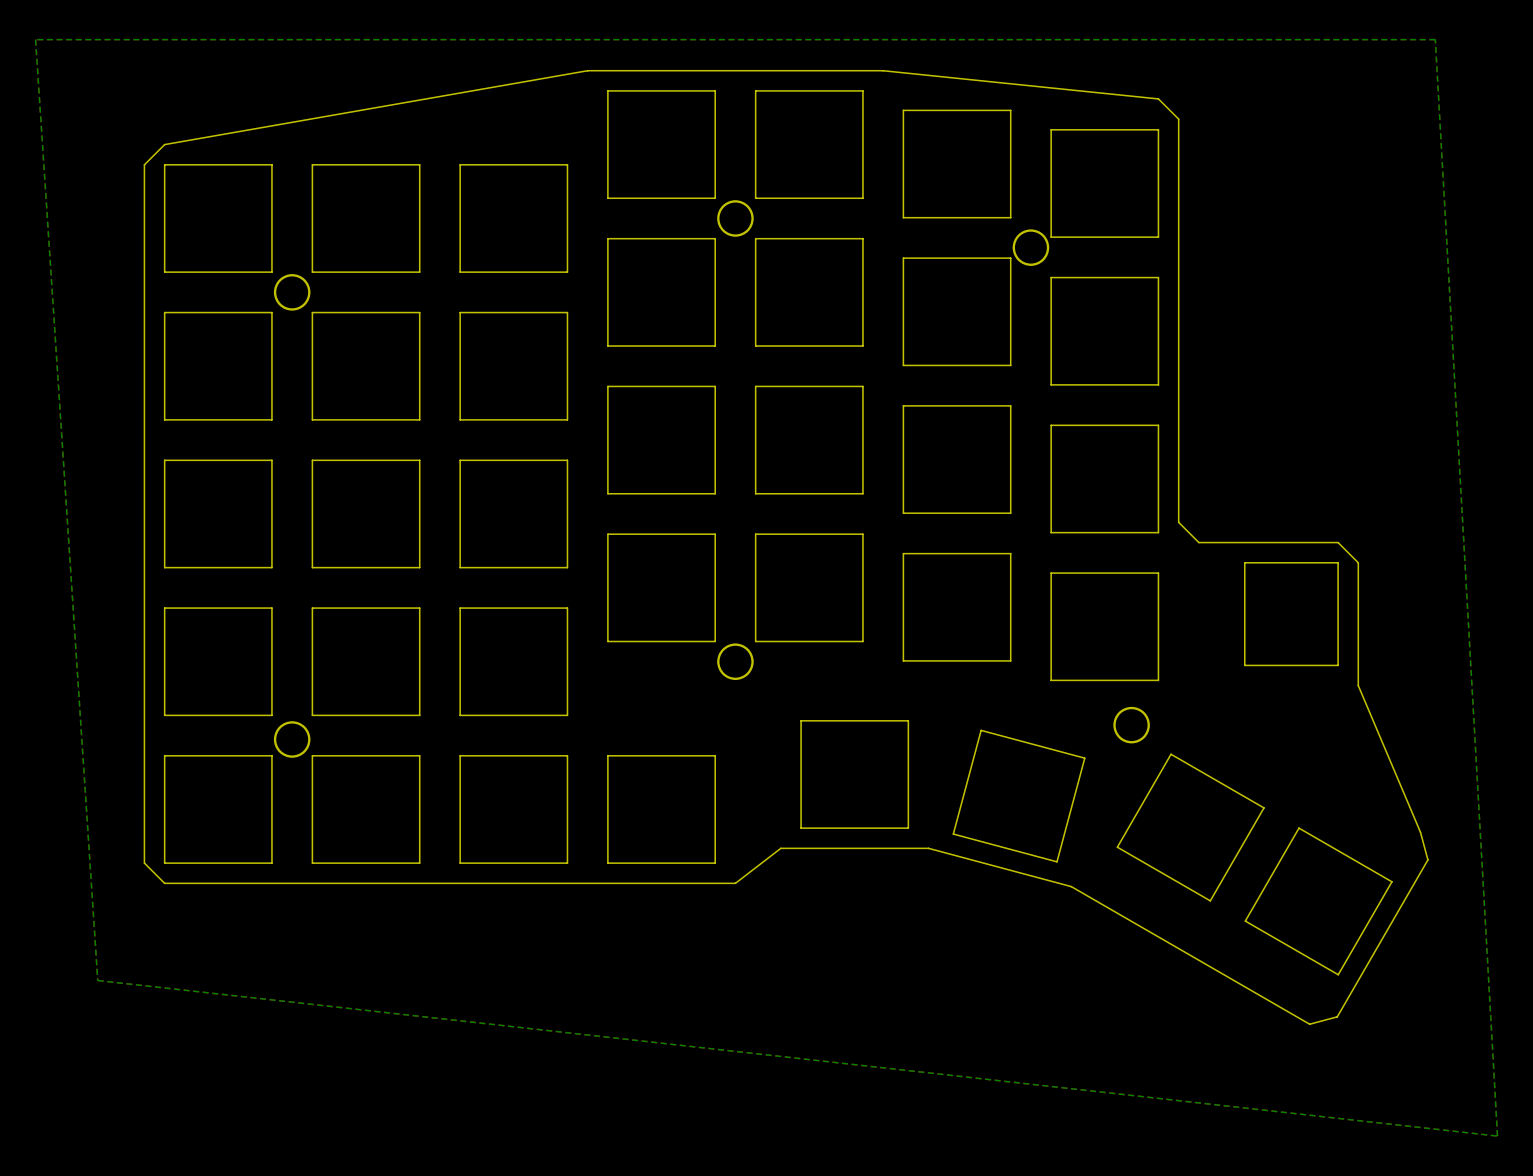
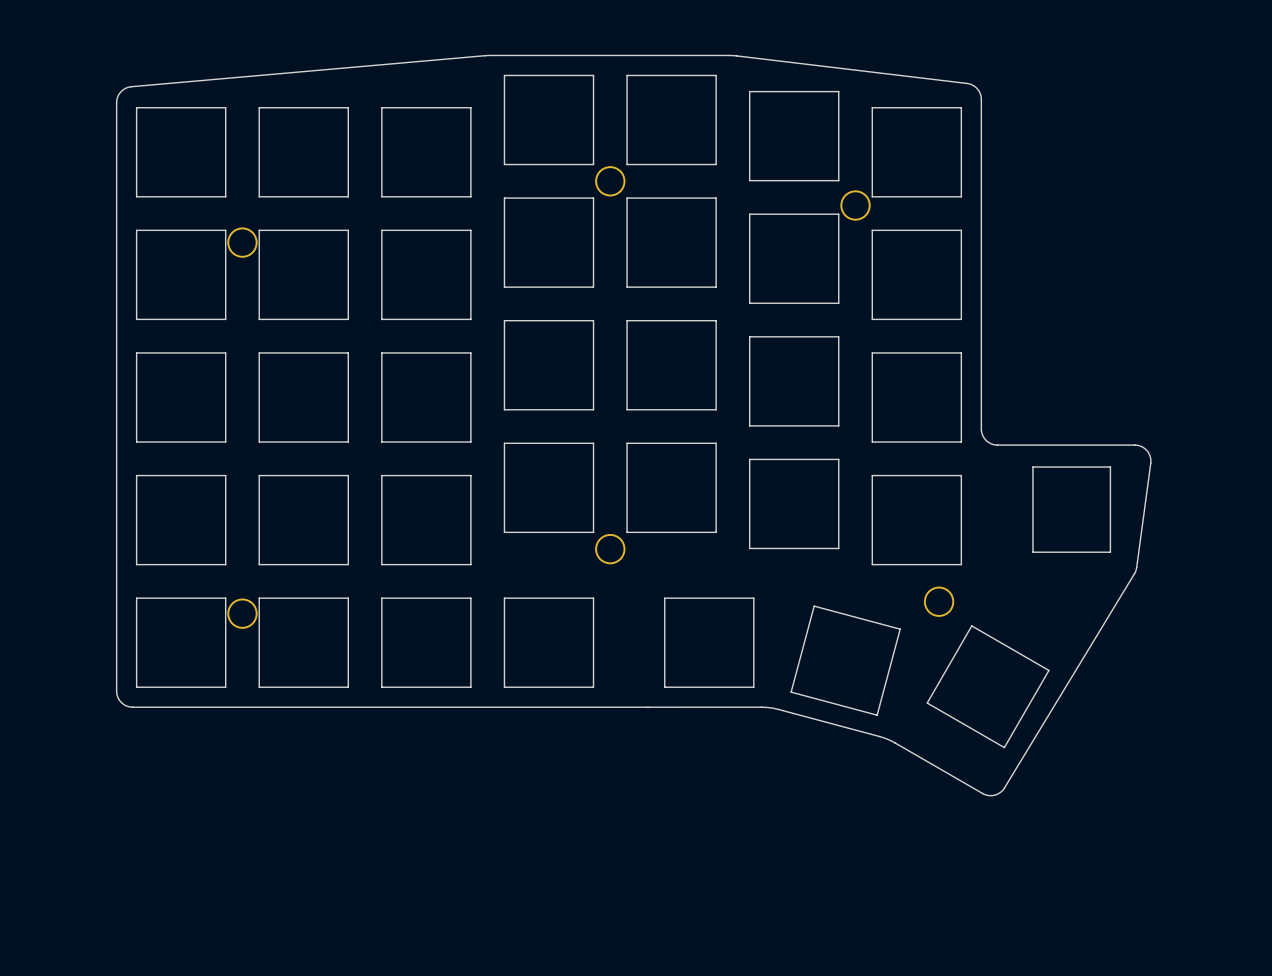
bottom zone outline: (1435, 39) (1497, 1136) (97, 980) (35, 39) (1435, 39) -> none
board edge: (883, 70) (1158, 98) (1178, 119) (1178, 522) (1198, 542) (1338, 542) (1358, 562) (1358, 685) (1420, 832) (1427, 859) (1337, 1016) (1309, 1024) (1071, 886) (928, 848) (780, 848) (735, 883) (164, 883) (144, 863) (144, 164) (164, 144) (587, 70) (883, 70) -> (729, 55) (967, 83) (975, 87) (981, 99) (982, 435) (987, 441) (997, 445) (1136, 445) (1143, 447) (1149, 455) (1150, 463) (1135, 572) (1001, 791) (994, 795) (984, 794) (883, 737) (770, 707) (132, 707) (121, 702) (116, 691) (116, 102) (120, 91) (131, 86) (487, 55) (729, 55)
board edge: (271, 164) (164, 164) -> (225, 136) (225, 107) (136, 107) (136, 136)
board edge: (419, 164) (312, 164) -> (348, 136) (348, 107) (259, 107) (259, 136)
board edge: (567, 164) (460, 164) -> (470, 136) (470, 107) (381, 107) (381, 136)
board edge: (271, 237) (271, 272) (164, 272) (164, 237) -> (225, 196) (136, 196)
board edge: (419, 237) (419, 272) (312, 272) (312, 237) -> (348, 196) (259, 196)
board edge: (567, 237) (567, 272) (460, 272) (460, 237) -> (470, 196) (381, 196)
board edge: (271, 312) (164, 312) -> (225, 259) (225, 230) (136, 230) (136, 259)
board edge: (419, 312) (312, 312) -> (348, 259) (348, 230) (259, 230) (259, 259)
board edge: (567, 312) (460, 312) -> (470, 259) (470, 230) (381, 230) (381, 259)
board edge: (271, 384) (271, 419) (164, 419) (164, 384) -> (225, 319) (136, 319)
board edge: (419, 384) (419, 419) (312, 419) (312, 384) -> (348, 319) (259, 319)
board edge: (567, 384) (567, 419) (460, 419) (460, 384) -> (470, 319) (381, 319)
board edge: (271, 460) (164, 460) -> (225, 381) (225, 352) (136, 352) (136, 381)
board edge: (419, 460) (312, 460) -> (348, 381) (348, 352) (259, 352) (259, 381)
board edge: (567, 460) (460, 460) -> (470, 381) (470, 352) (381, 352) (381, 381)
board edge: (271, 532) (271, 567) (164, 567) (164, 532) -> (225, 442) (136, 442)
board edge: (419, 532) (419, 567) (312, 567) (312, 532) -> (348, 442) (259, 442)
board edge: (567, 532) (567, 567) (460, 567) (460, 532) -> (470, 442) (381, 442)
board edge: (271, 608) (164, 608) -> (225, 504) (225, 475) (136, 475) (136, 504)
board edge: (419, 608) (312, 608) -> (348, 504) (348, 475) (259, 475) (259, 504)
board edge: (567, 608) (460, 608) -> (470, 504) (470, 475) (381, 475) (381, 504)
board edge: (271, 680) (271, 715) (164, 715) (164, 680) -> (225, 564) (136, 564)
board edge: (419, 680) (419, 715) (312, 715) (312, 680) -> (348, 564) (259, 564)
board edge: (567, 680) (567, 715) (460, 715) (460, 680) -> (470, 564) (381, 564)
board edge: (271, 755) (164, 755) -> (225, 627) (225, 598) (136, 598) (136, 627)
board edge: (419, 755) (312, 755) -> (348, 627) (348, 598) (259, 598) (259, 627)
board edge: (567, 755) (460, 755) -> (470, 627) (470, 598) (381, 598) (381, 627)
board edge: (715, 755) (607, 755) -> (593, 627) (593, 598) (504, 598) (504, 627)
board edge: (271, 828) (271, 863) (164, 863) (164, 828) -> (225, 687) (136, 687)
board edge: (419, 828) (419, 863) (312, 863) (312, 828) -> (348, 687) (259, 687)
board edge: (567, 828) (567, 863) (460, 863) (460, 828) -> (470, 687) (381, 687)
board edge: (715, 828) (715, 863) (607, 863) (607, 828) -> (593, 687) (504, 687)
board edge: (1298, 828) (1391, 881) (1338, 974) (1245, 921) (1298, 828) -> none

